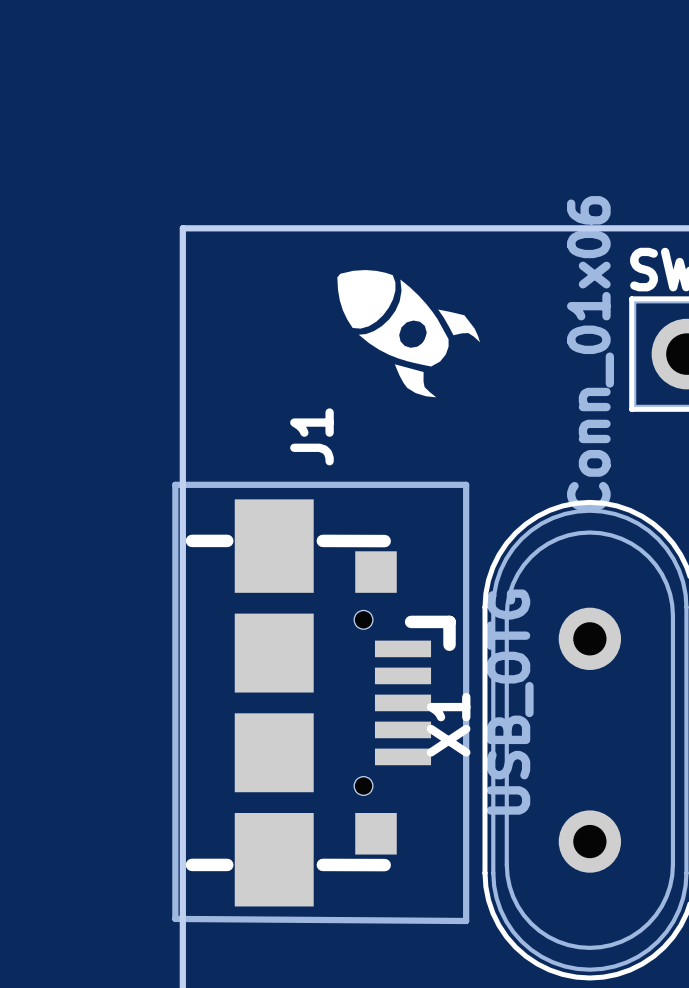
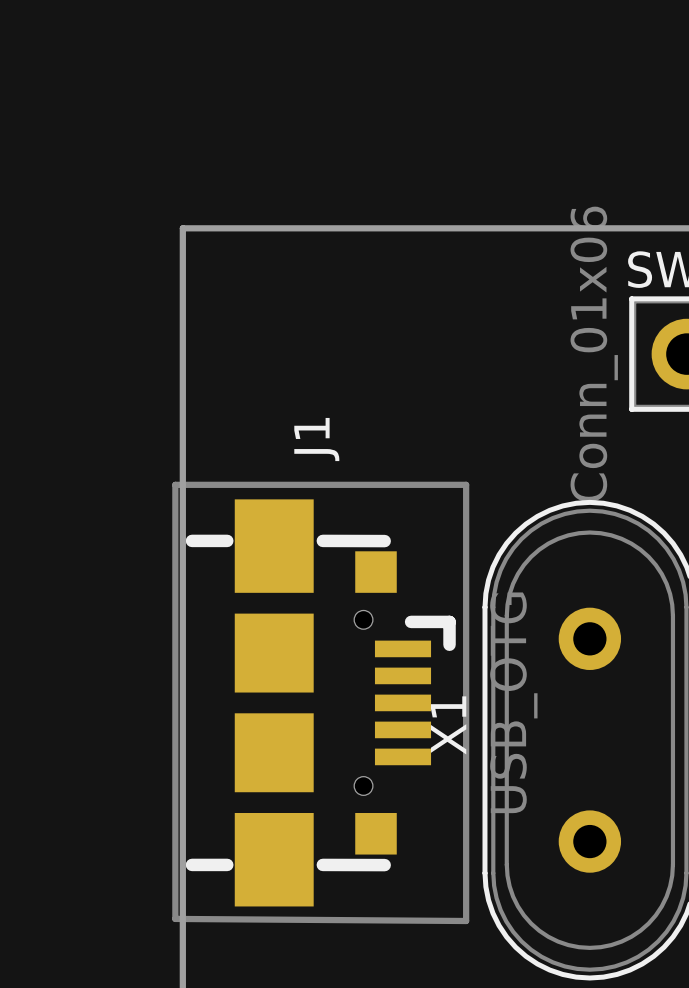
drawing: [337, 270, 481, 398] -> none

